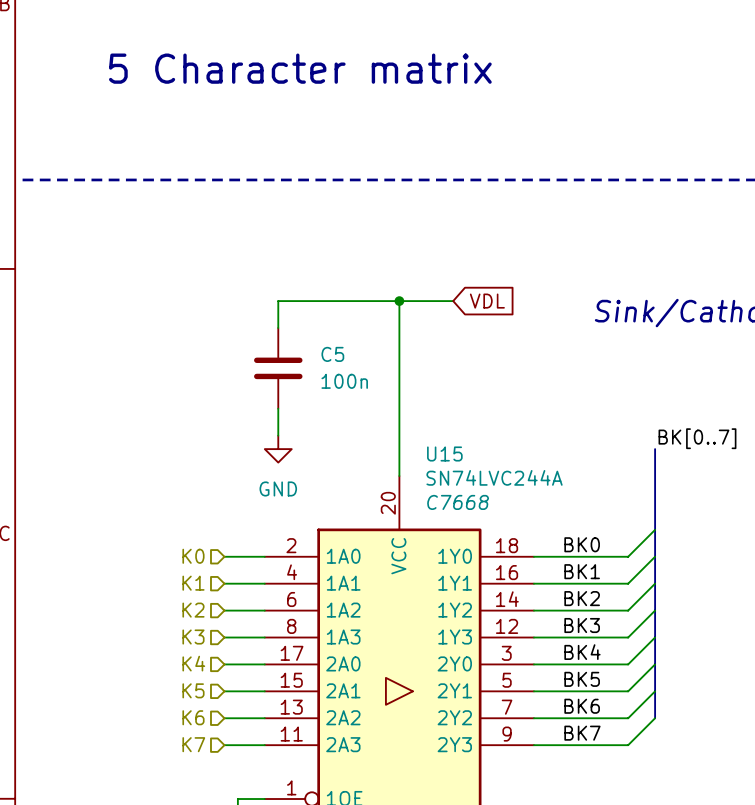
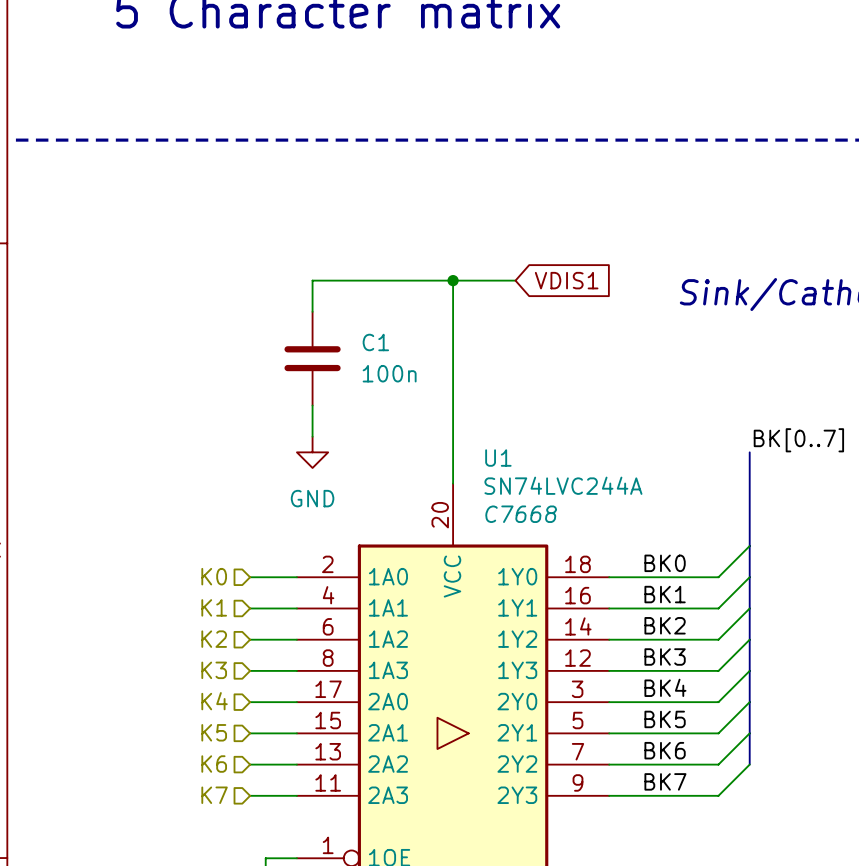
global label: VDL (487, 301) -> VDIS1 (566, 280)
C5 name: C5 (332, 354) -> C1 (375, 342)
U15 name: U15 (444, 453) -> U1 (498, 458)

